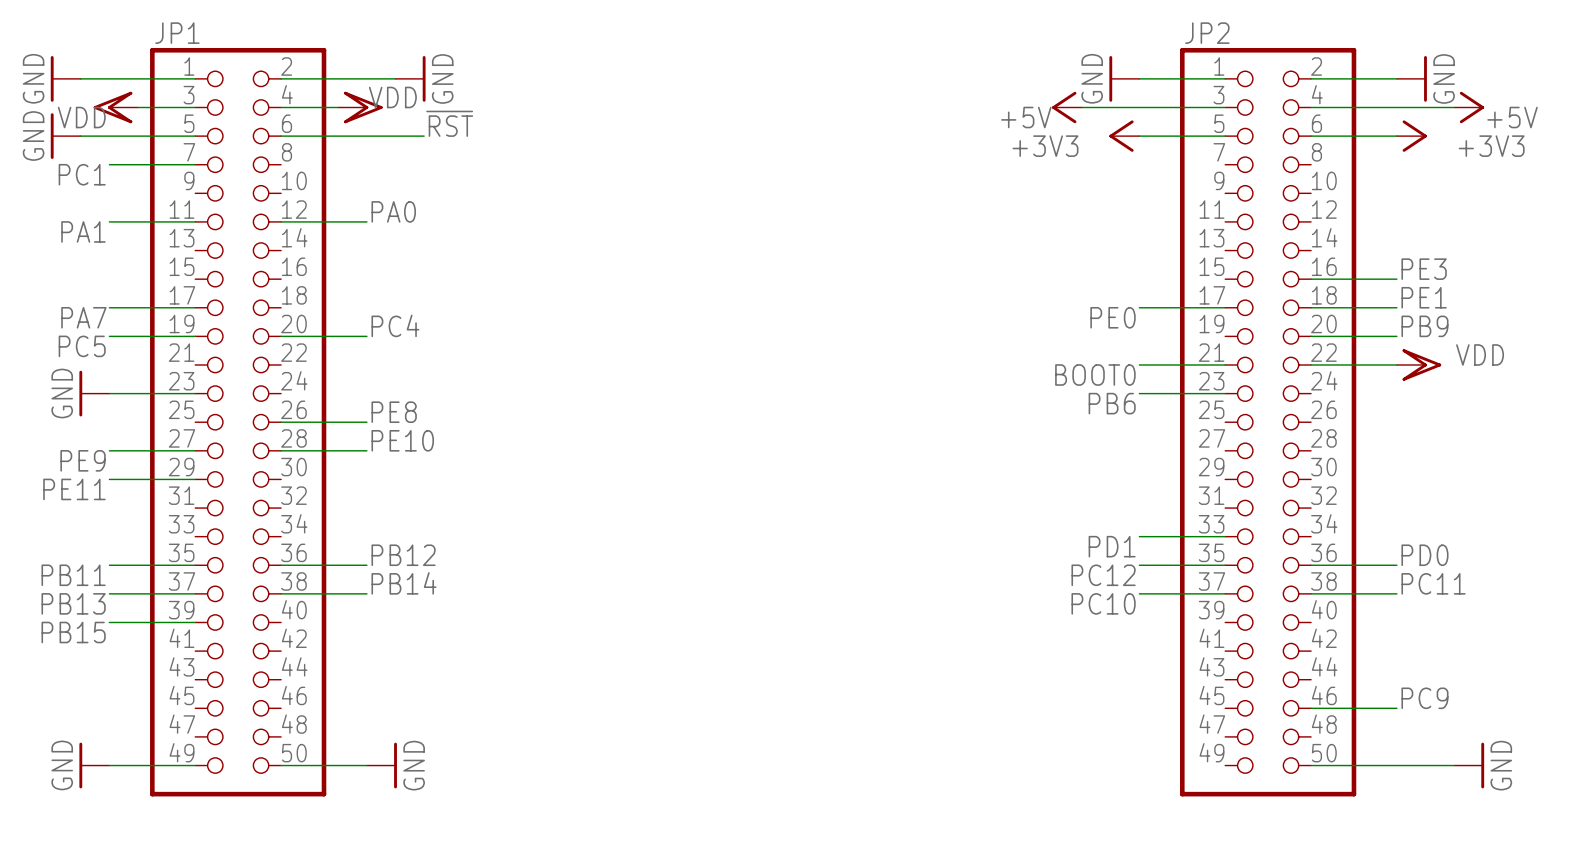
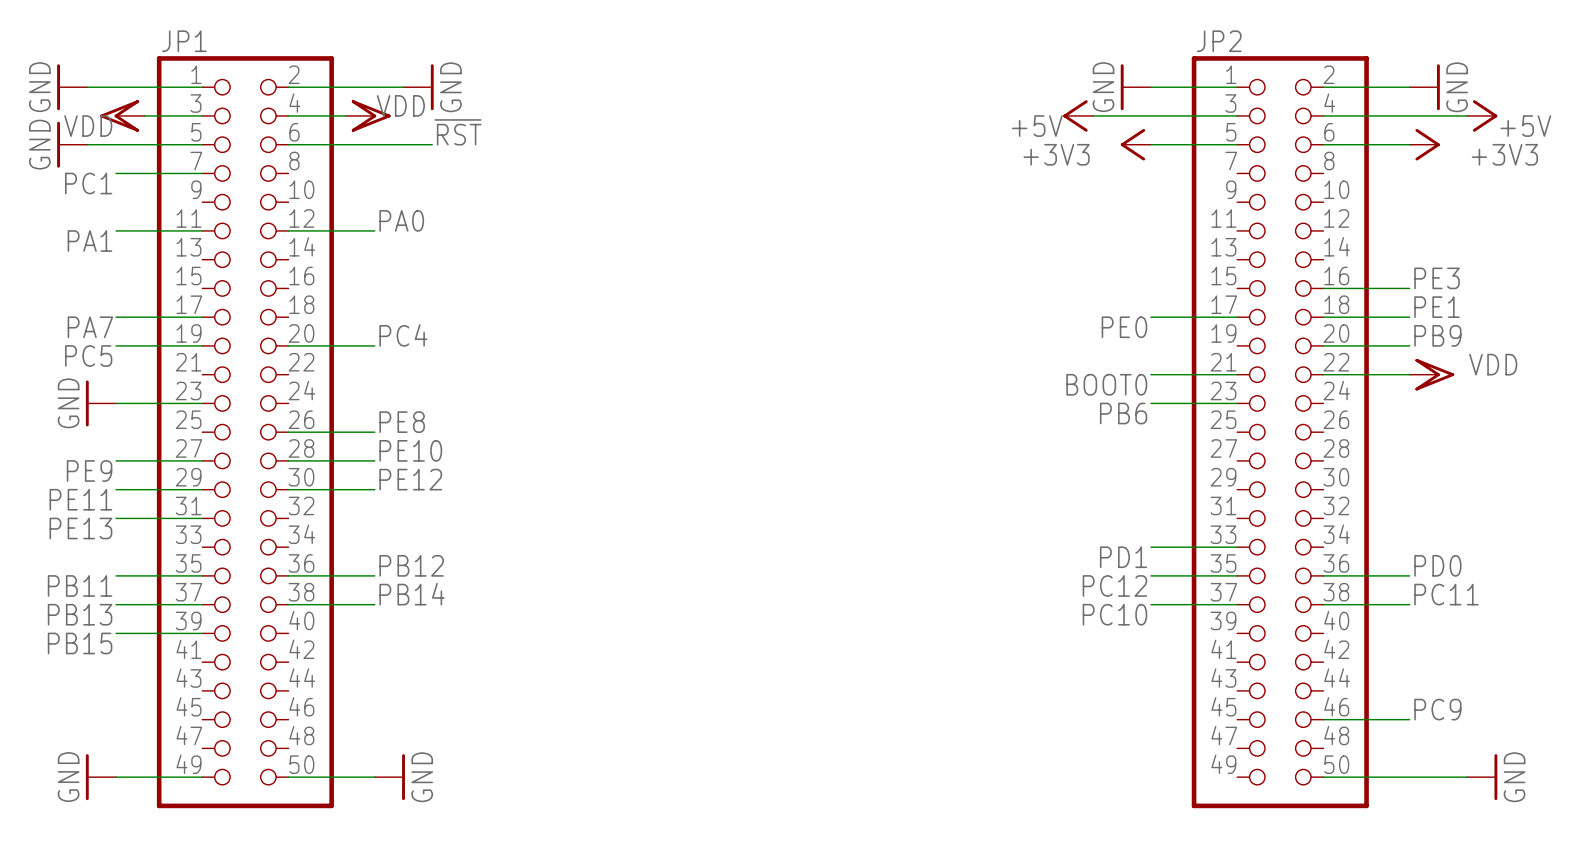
label: none -> PE12 (410, 479)
wire: none -> (288, 489) (374, 489)
wire: none -> (116, 518) (202, 518)
label: none -> PE13 (80, 528)

